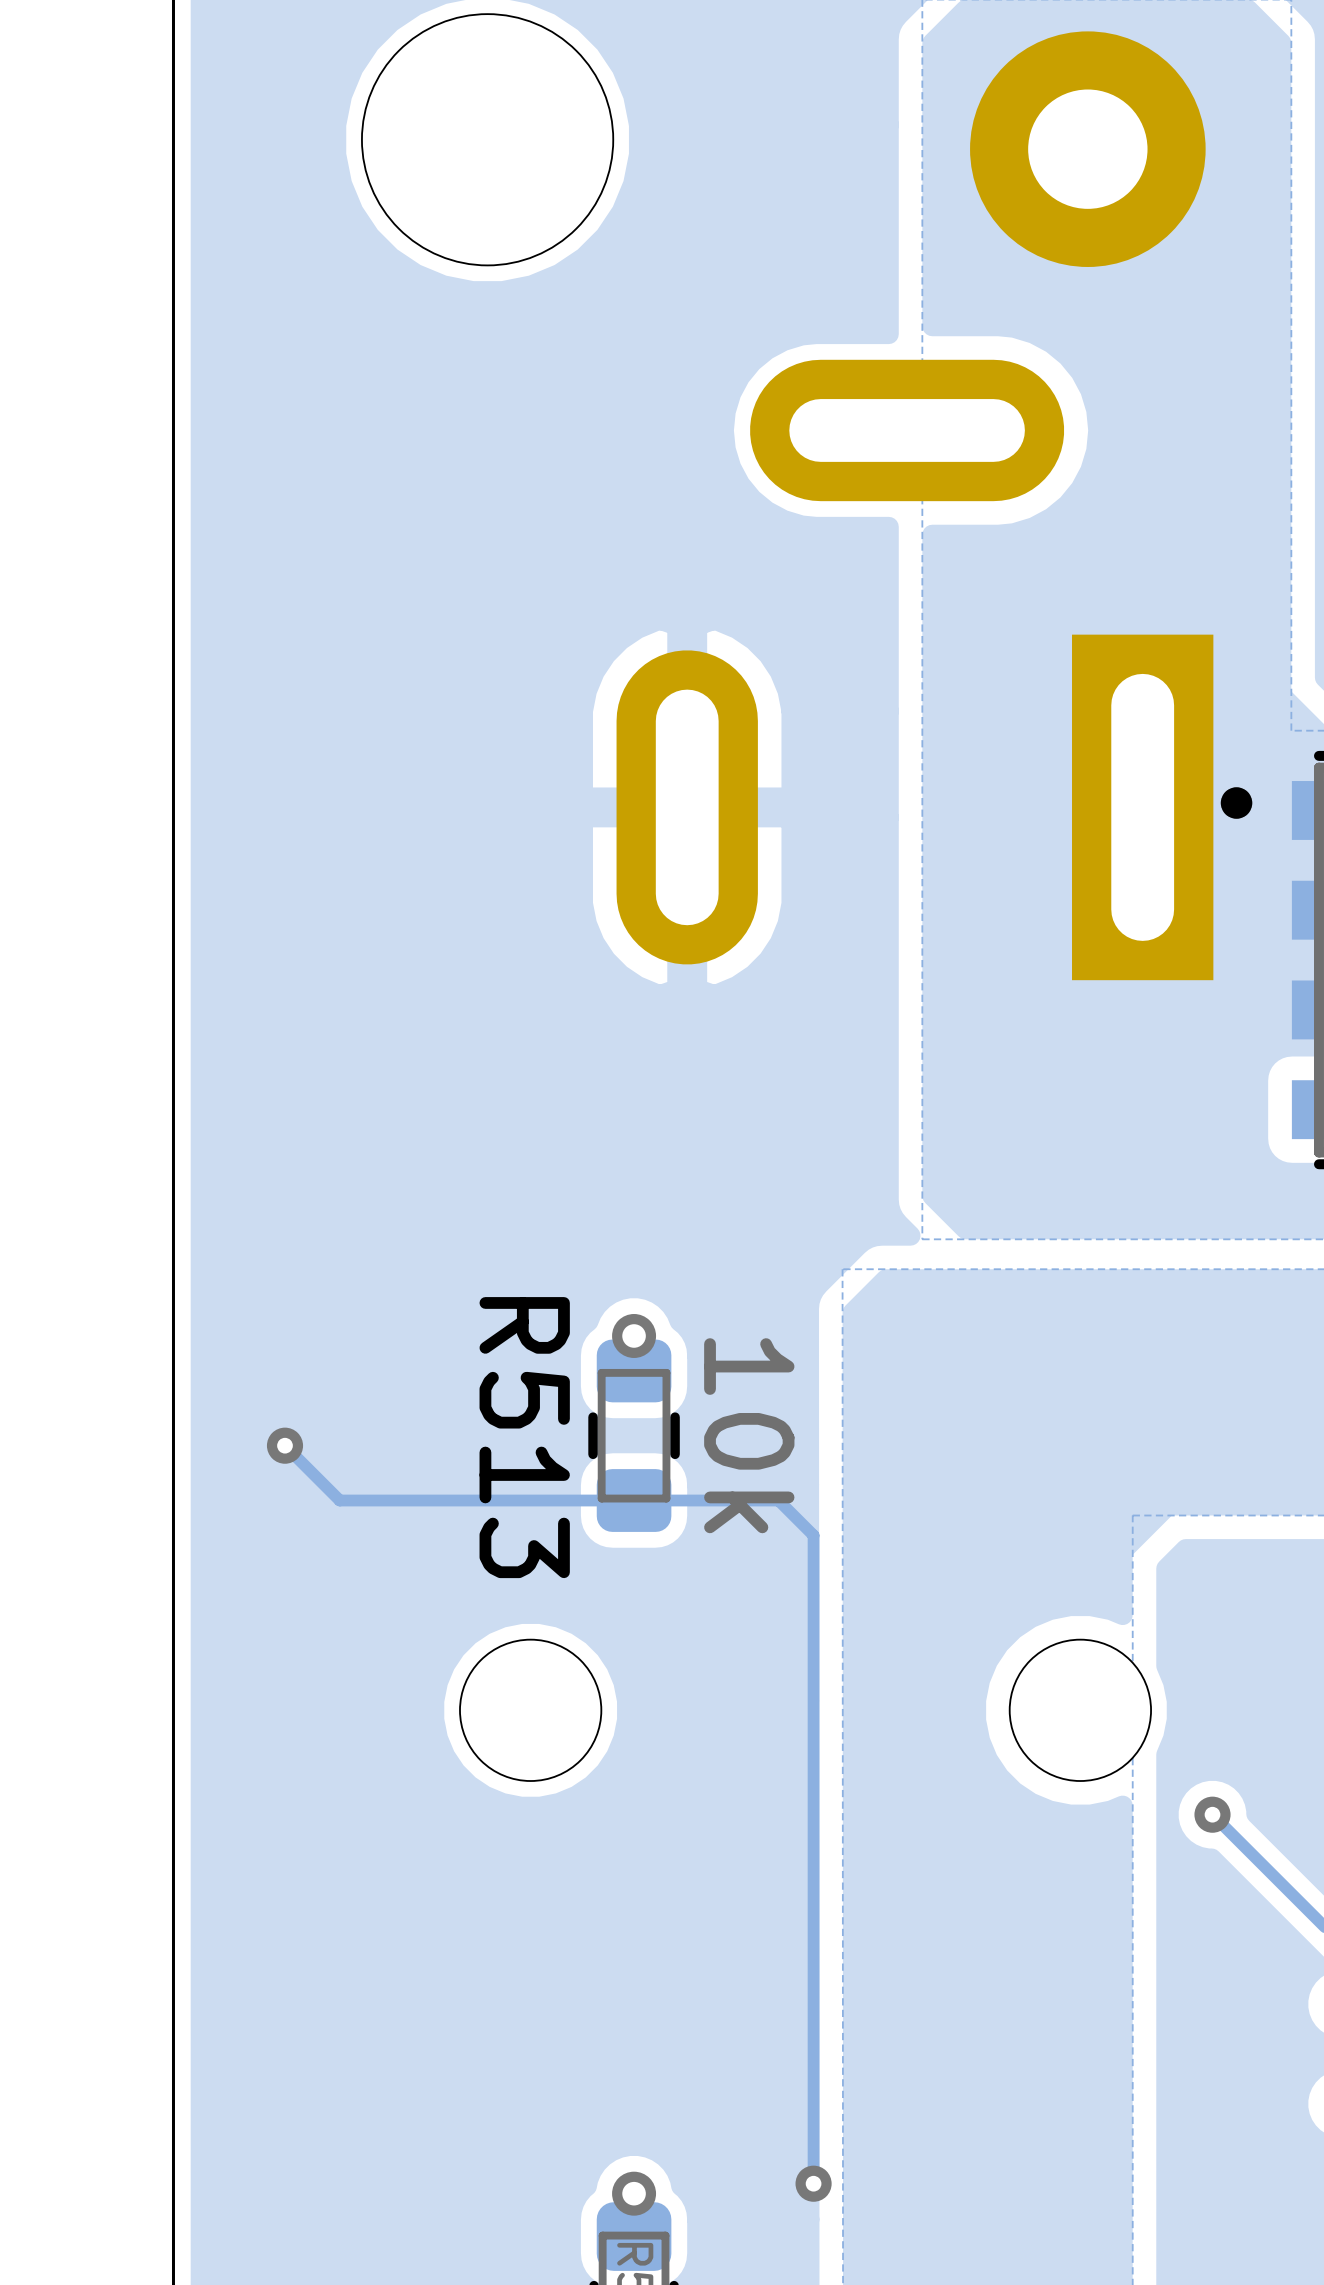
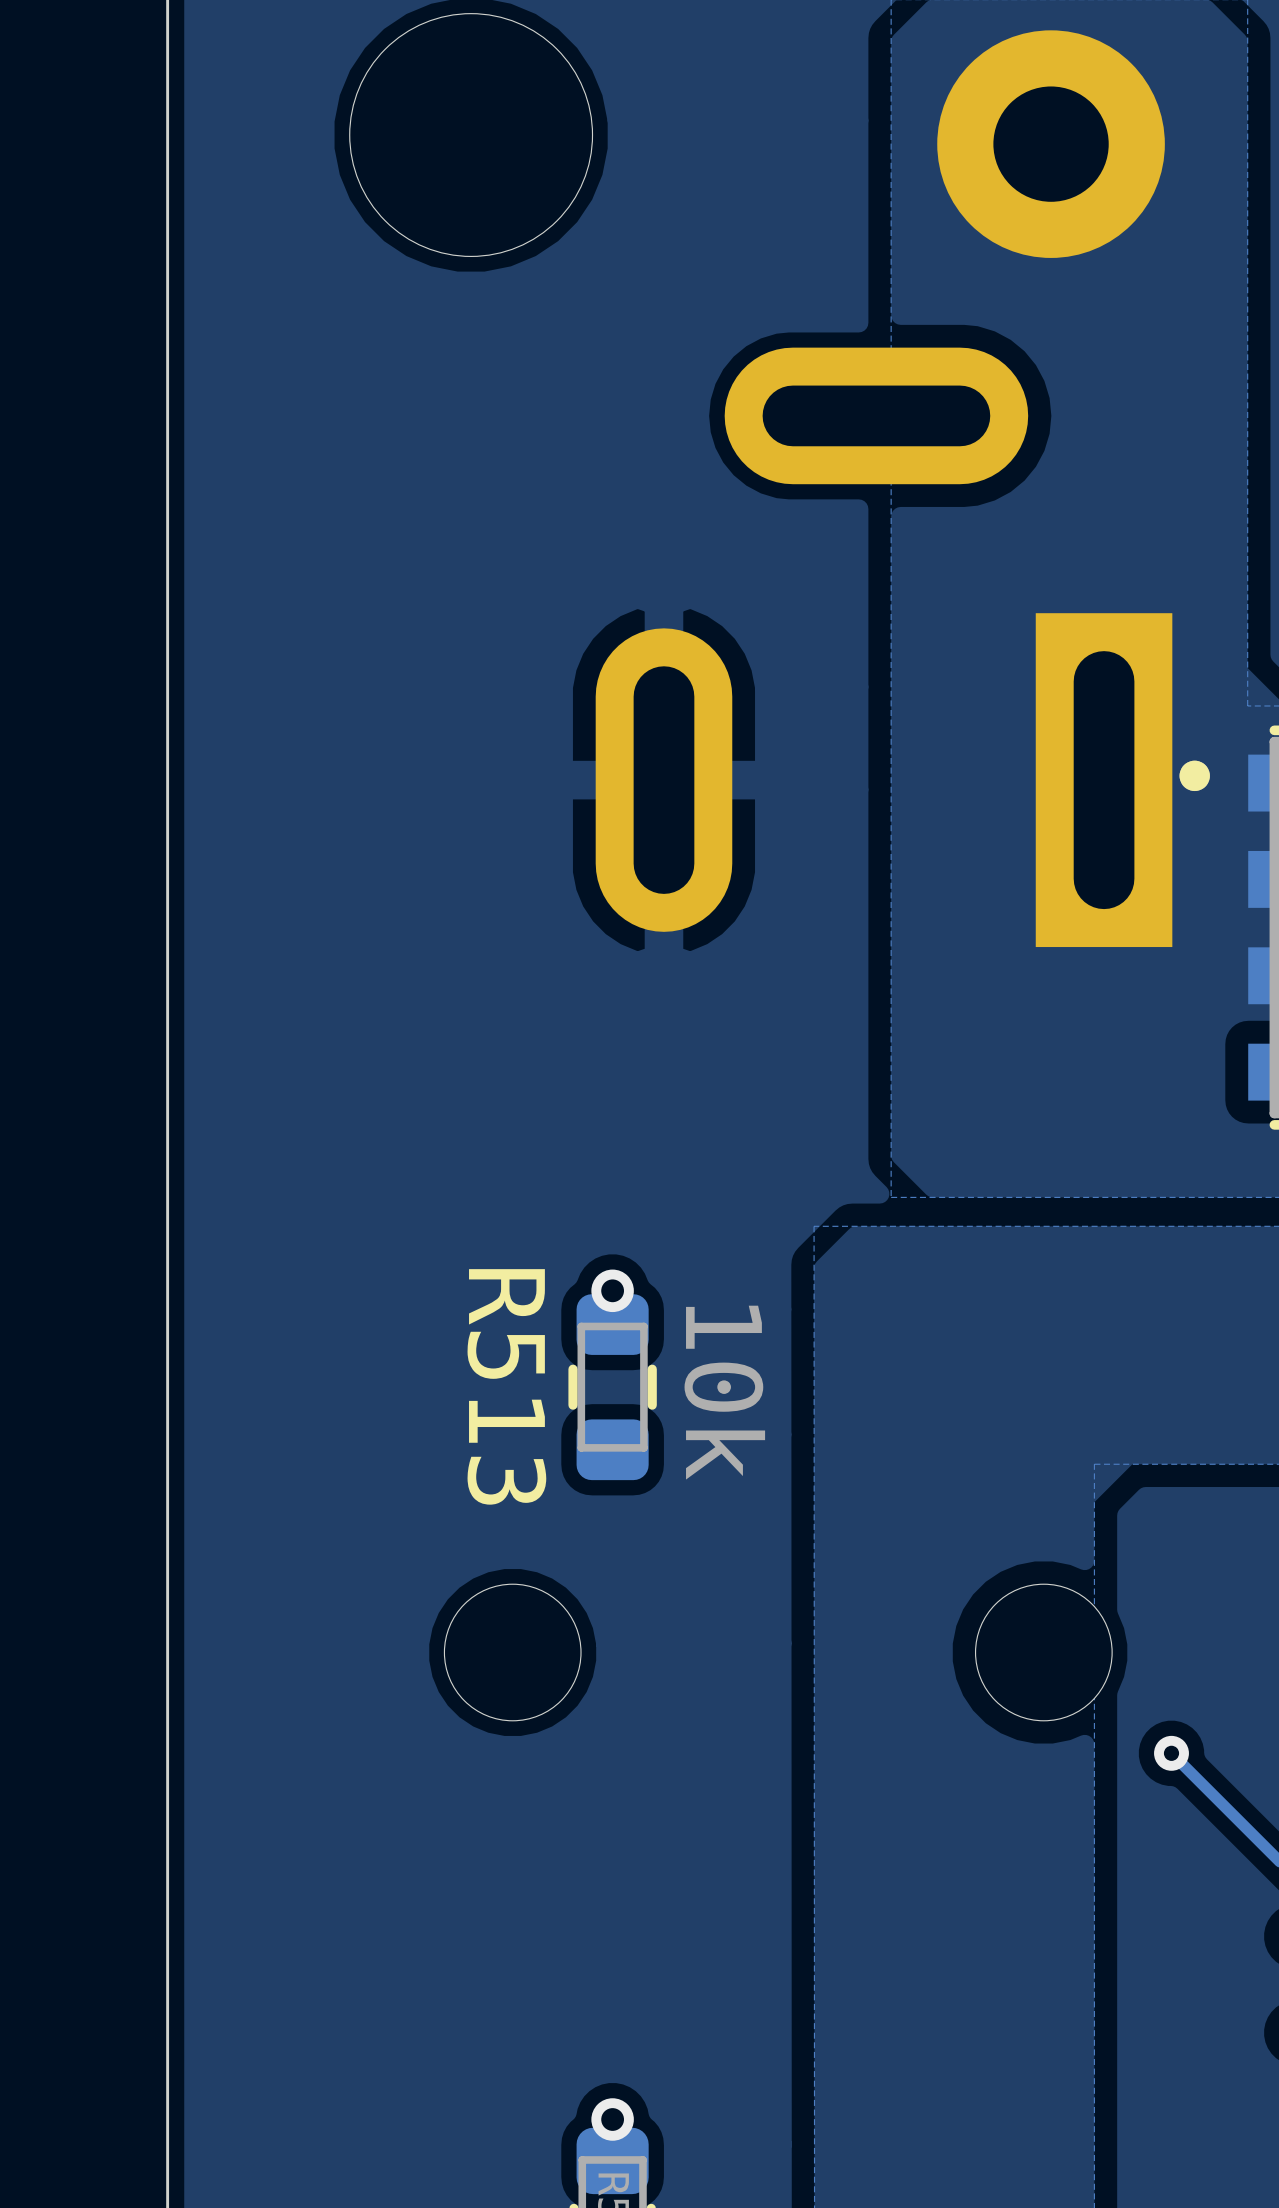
track: (285, 1445) (339, 1500) (778, 1500) (813, 1535) (813, 2183) -> none
via: (285, 1445) -> none
via: (813, 2183) -> none

